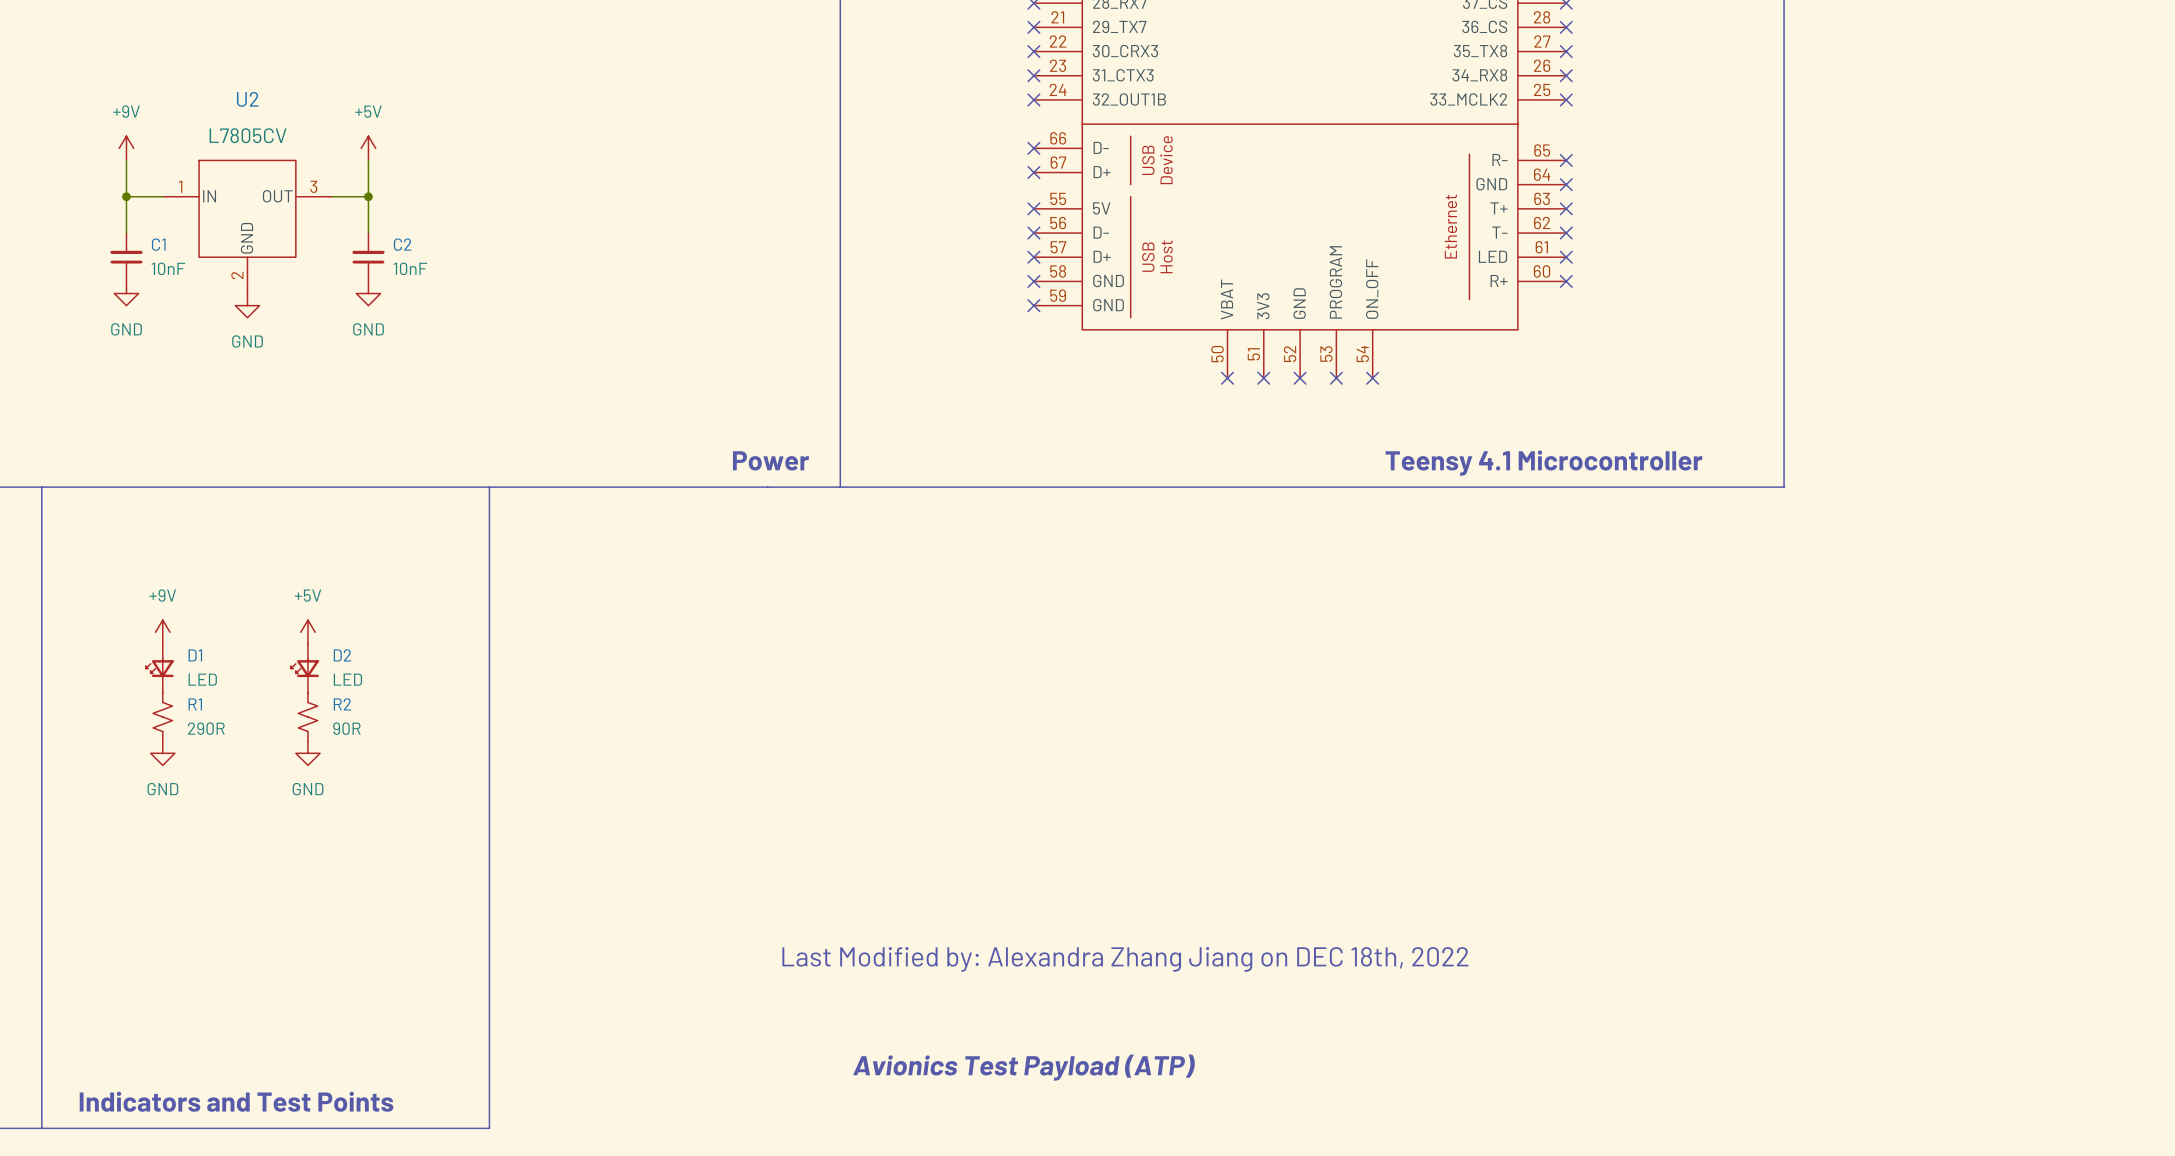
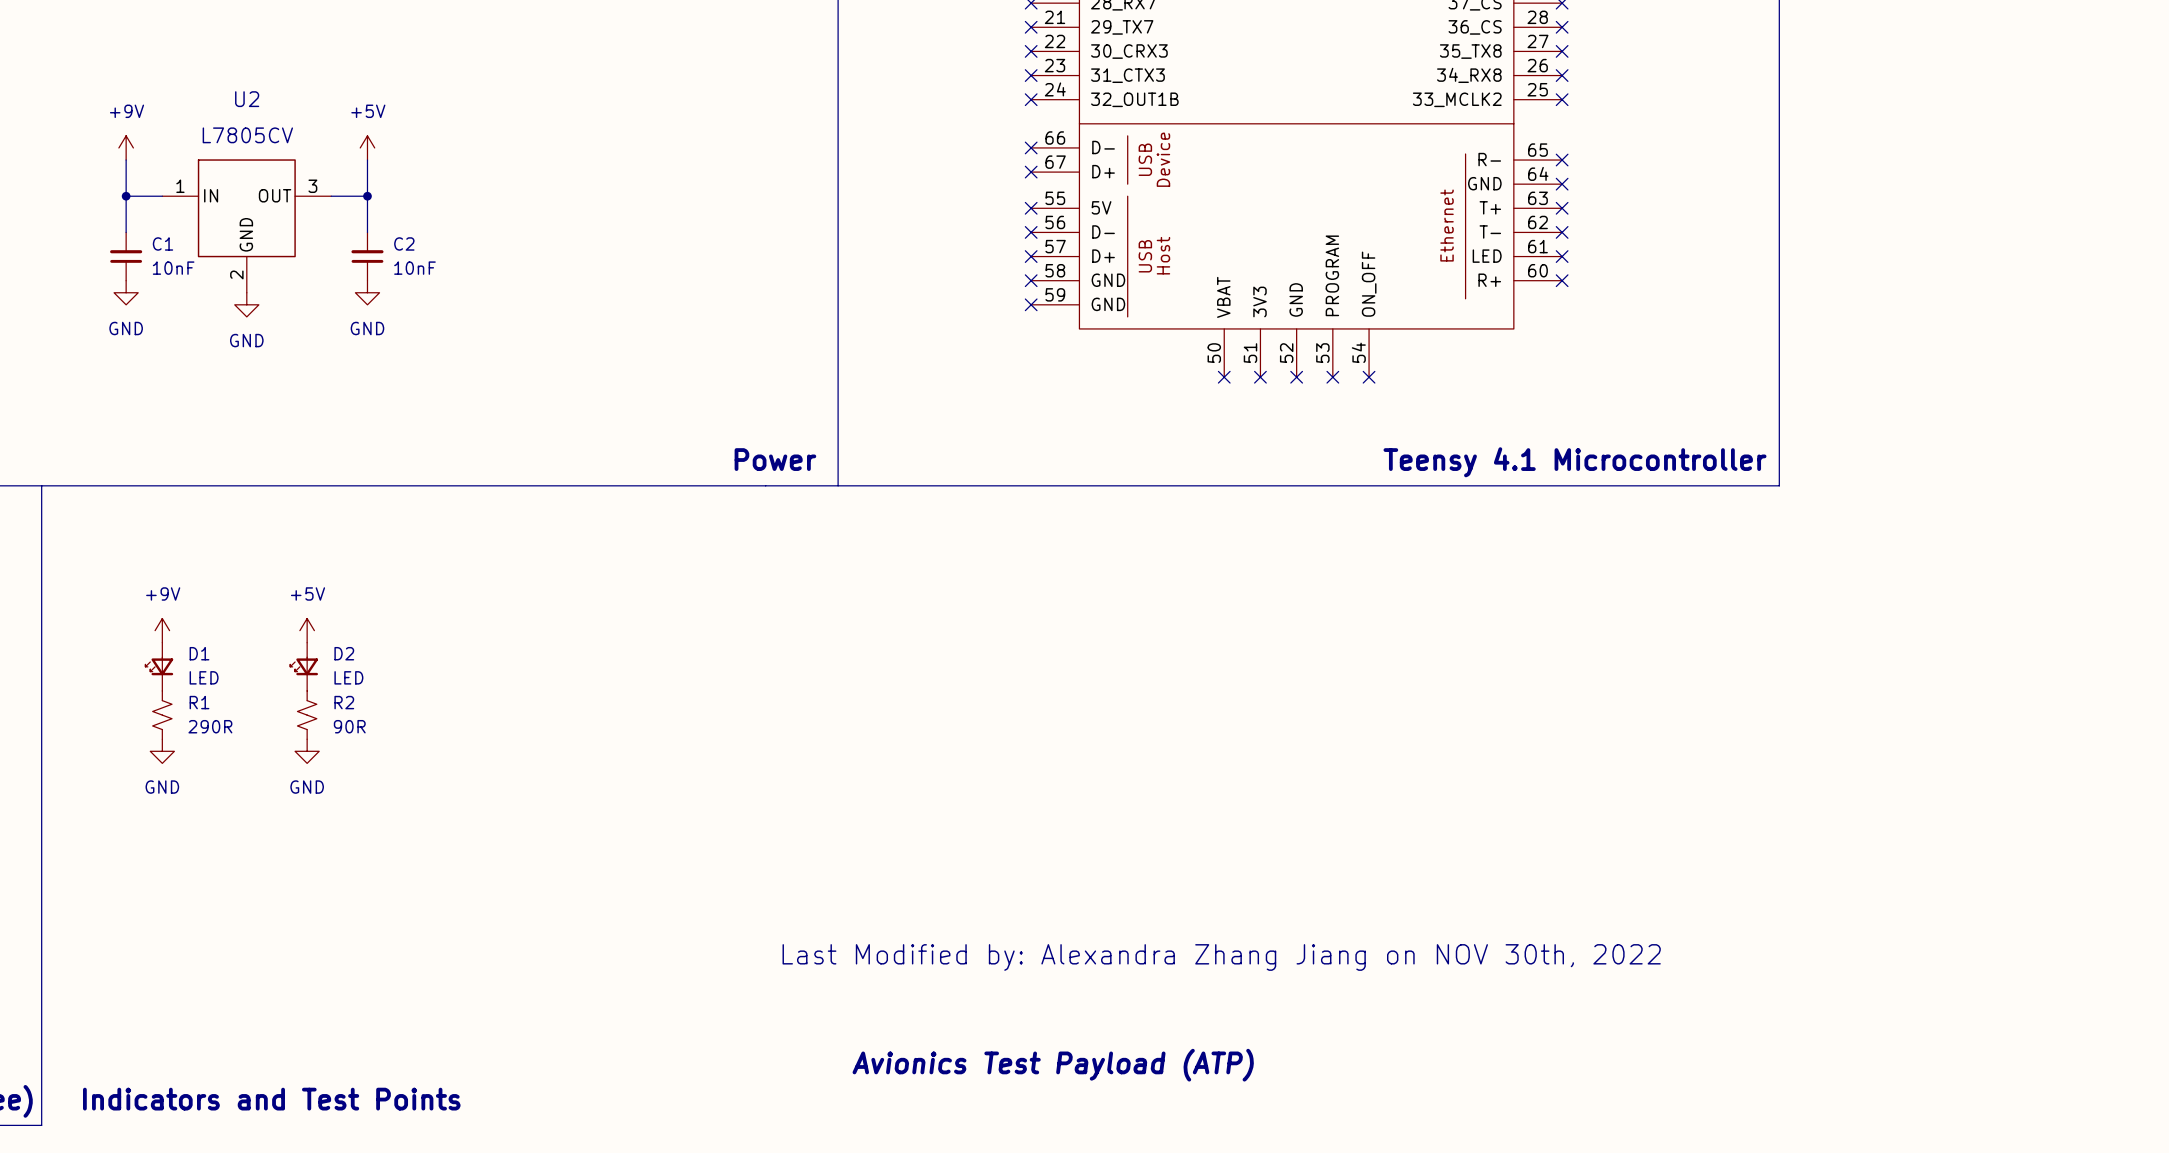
line: (489, 487) (489, 1128) (41, 1128) -> none
text: Last Modified by: Alexandra Zhang Jiang on DEC 18th, 2022 (1125, 959) -> Last Modified by: Alexandra Zhang Jiang on NOV 30th, 2022 (1221, 957)

